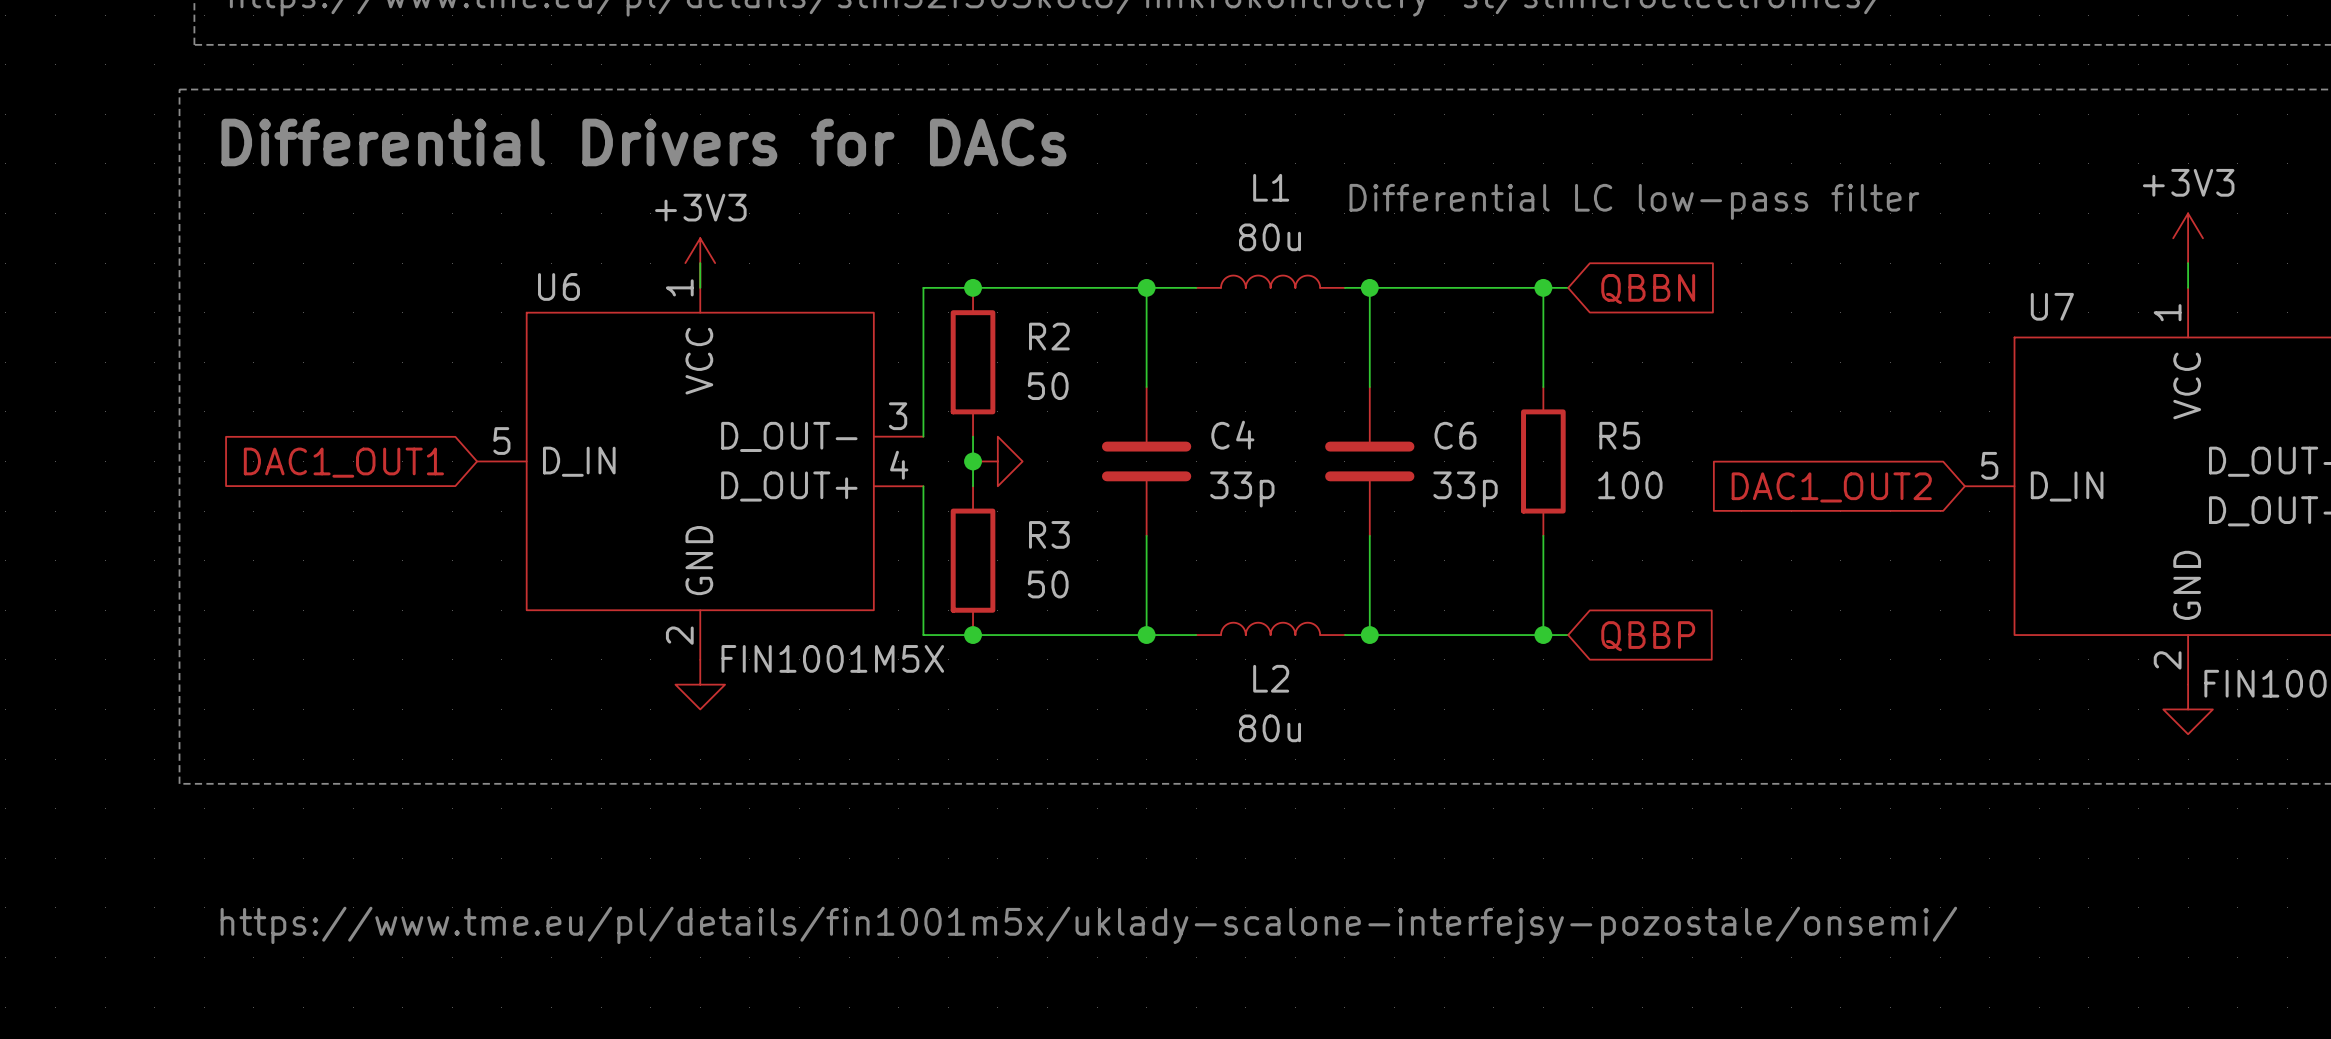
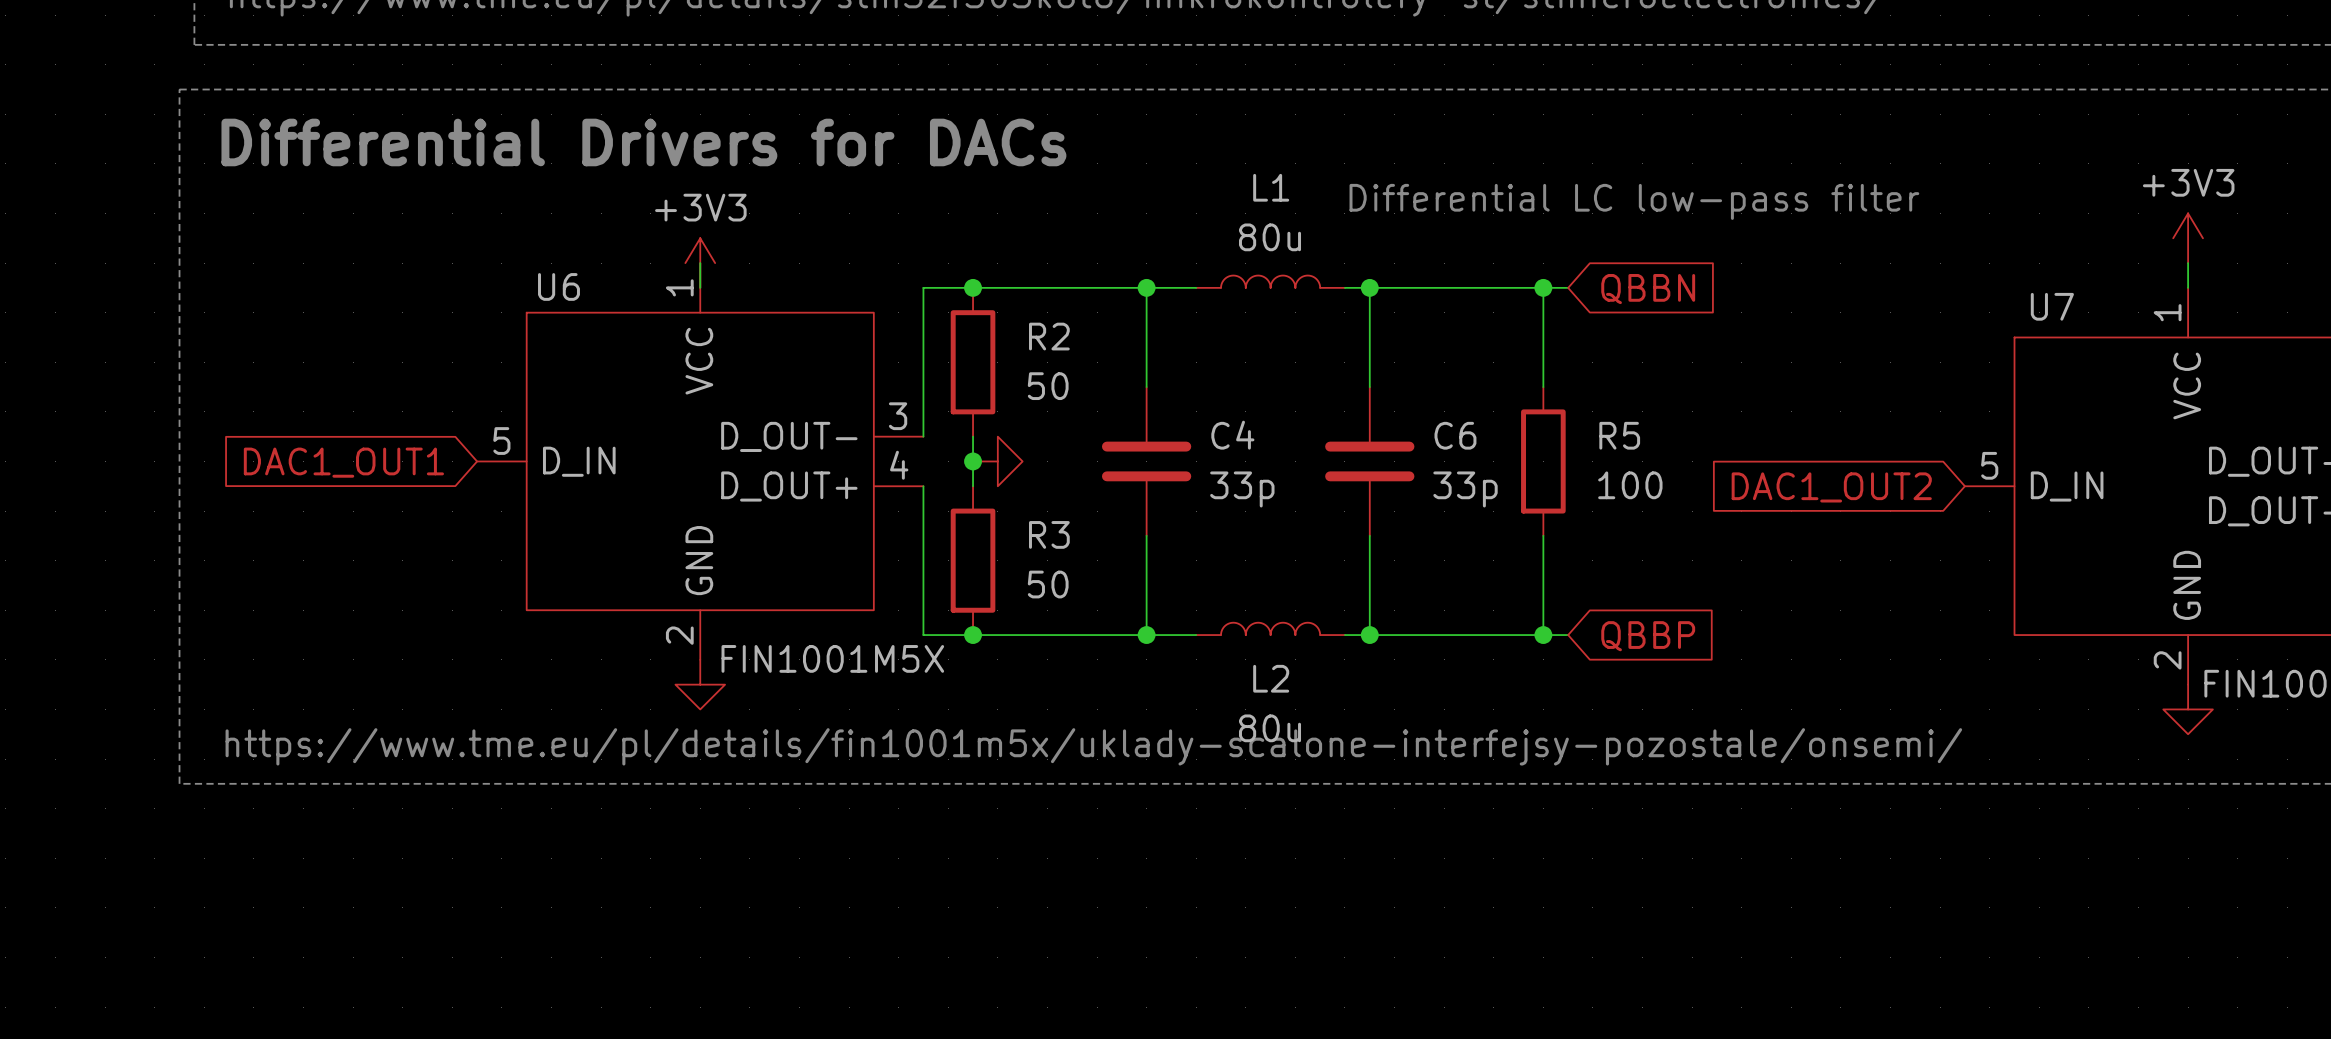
text position: https://www.tme.eu/pl/details/fin1001m5x/uklady-scalone-interfejsy-pozostale/onsemi/ (1088, 925) -> https://www.tme.eu/pl/details/fin1001m5x/uklady-scalone-interfejsy-pozostale/onsemi/ (1093, 746)

